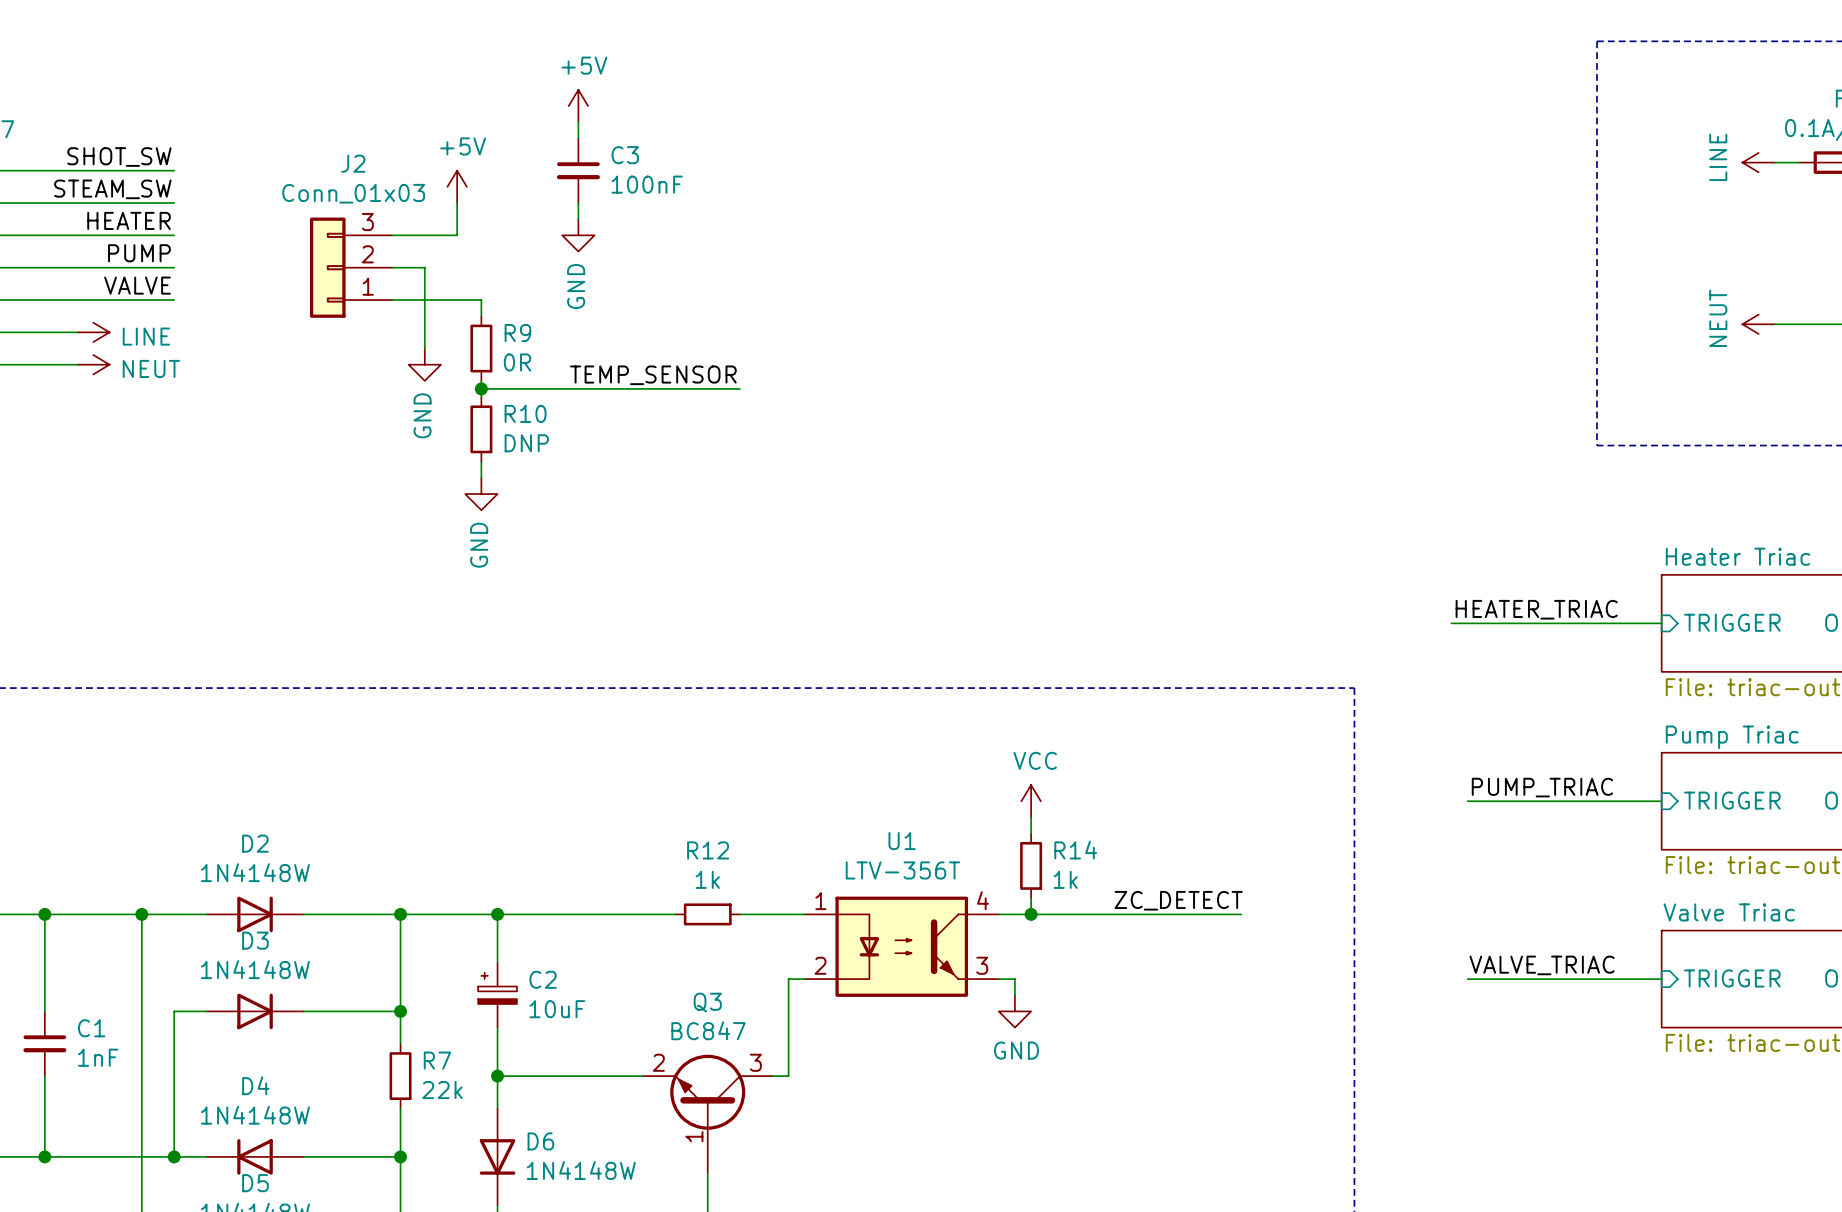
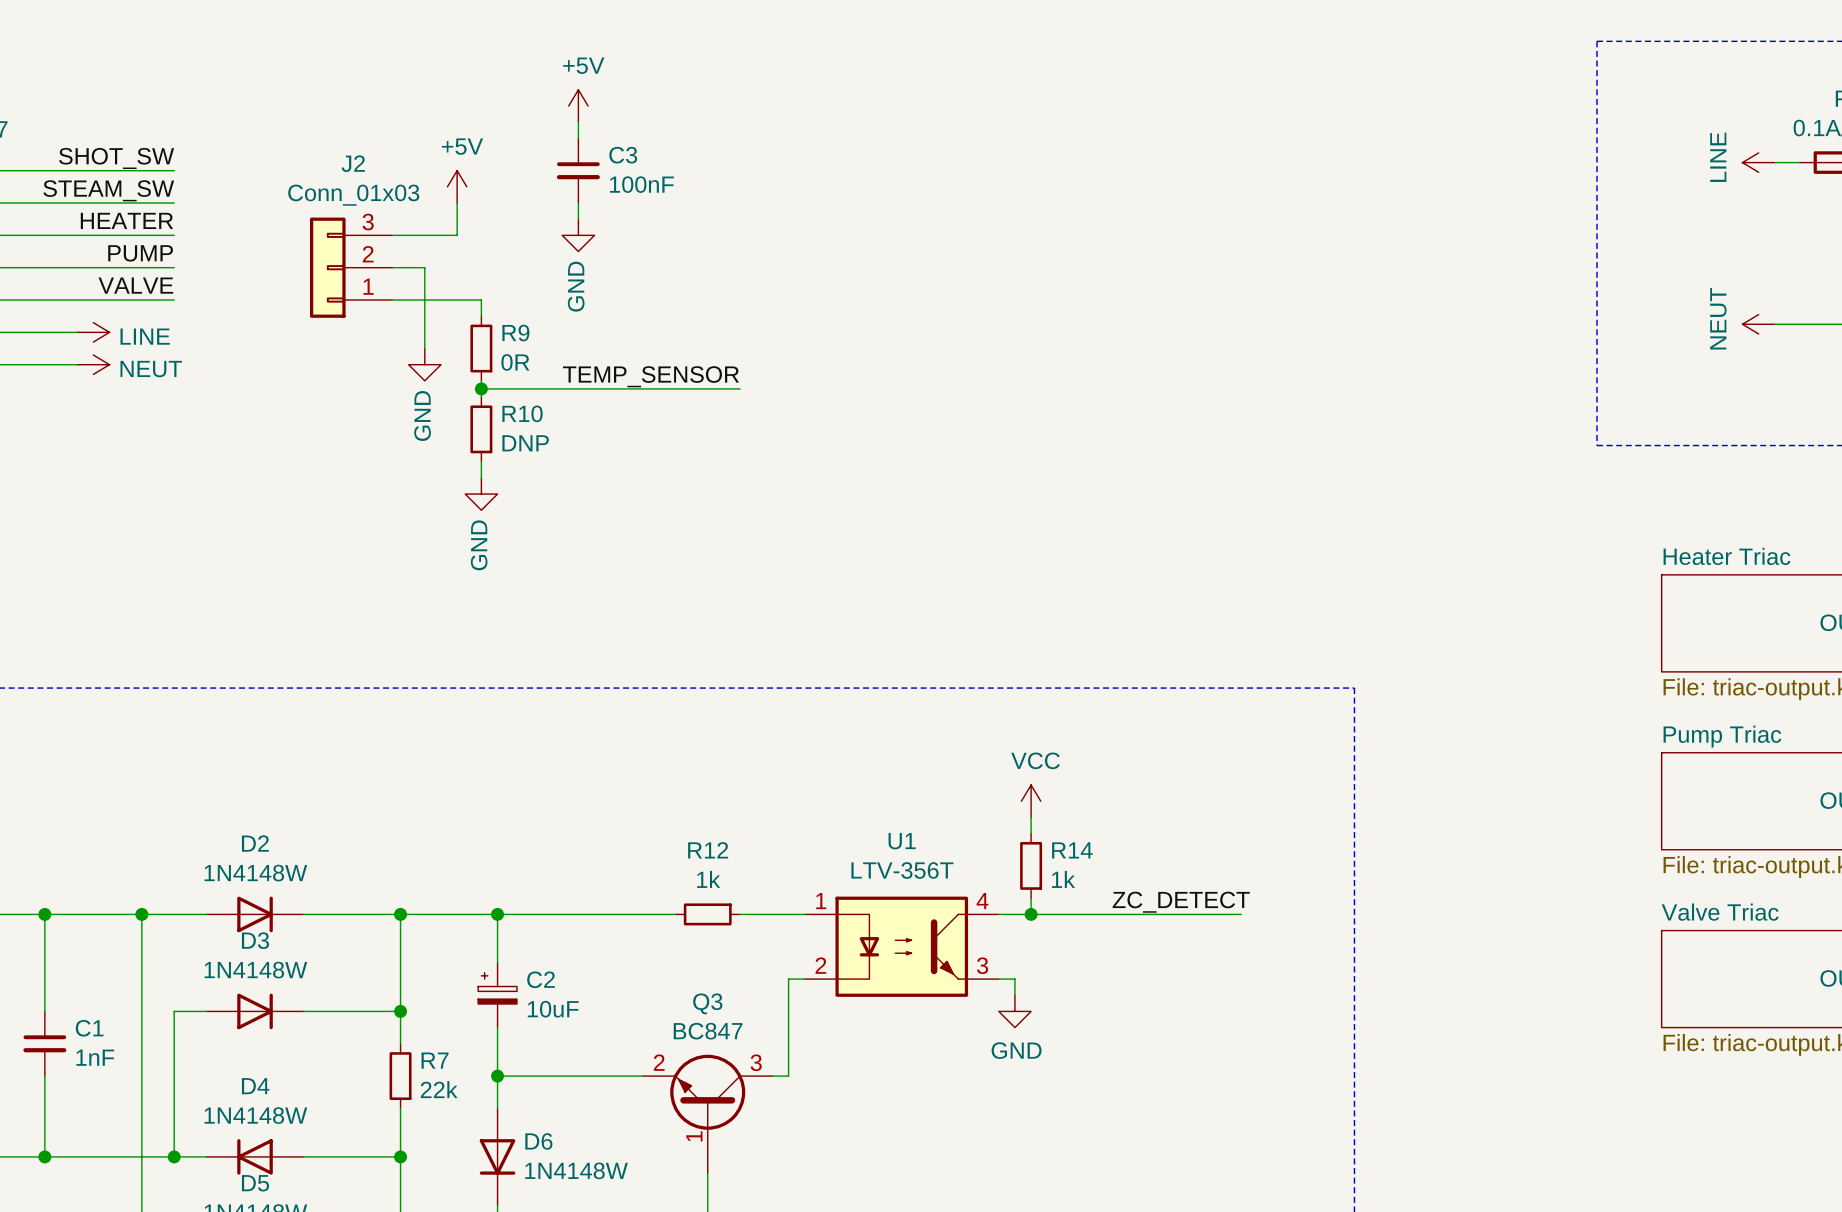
label: HEATER_TRIAC (1536, 609) -> none
sheet pin: TRIGGER (1732, 622) -> none
wire: (1451, 623) (1661, 623) -> none
label: PUMP_TRIAC (1542, 787) -> none
sheet pin: TRIGGER (1732, 800) -> none
wire: (1467, 801) (1661, 801) -> none
label: VALVE_TRIAC (1542, 965) -> none
sheet pin: TRIGGER (1732, 978) -> none
wire: (1467, 979) (1661, 979) -> none

